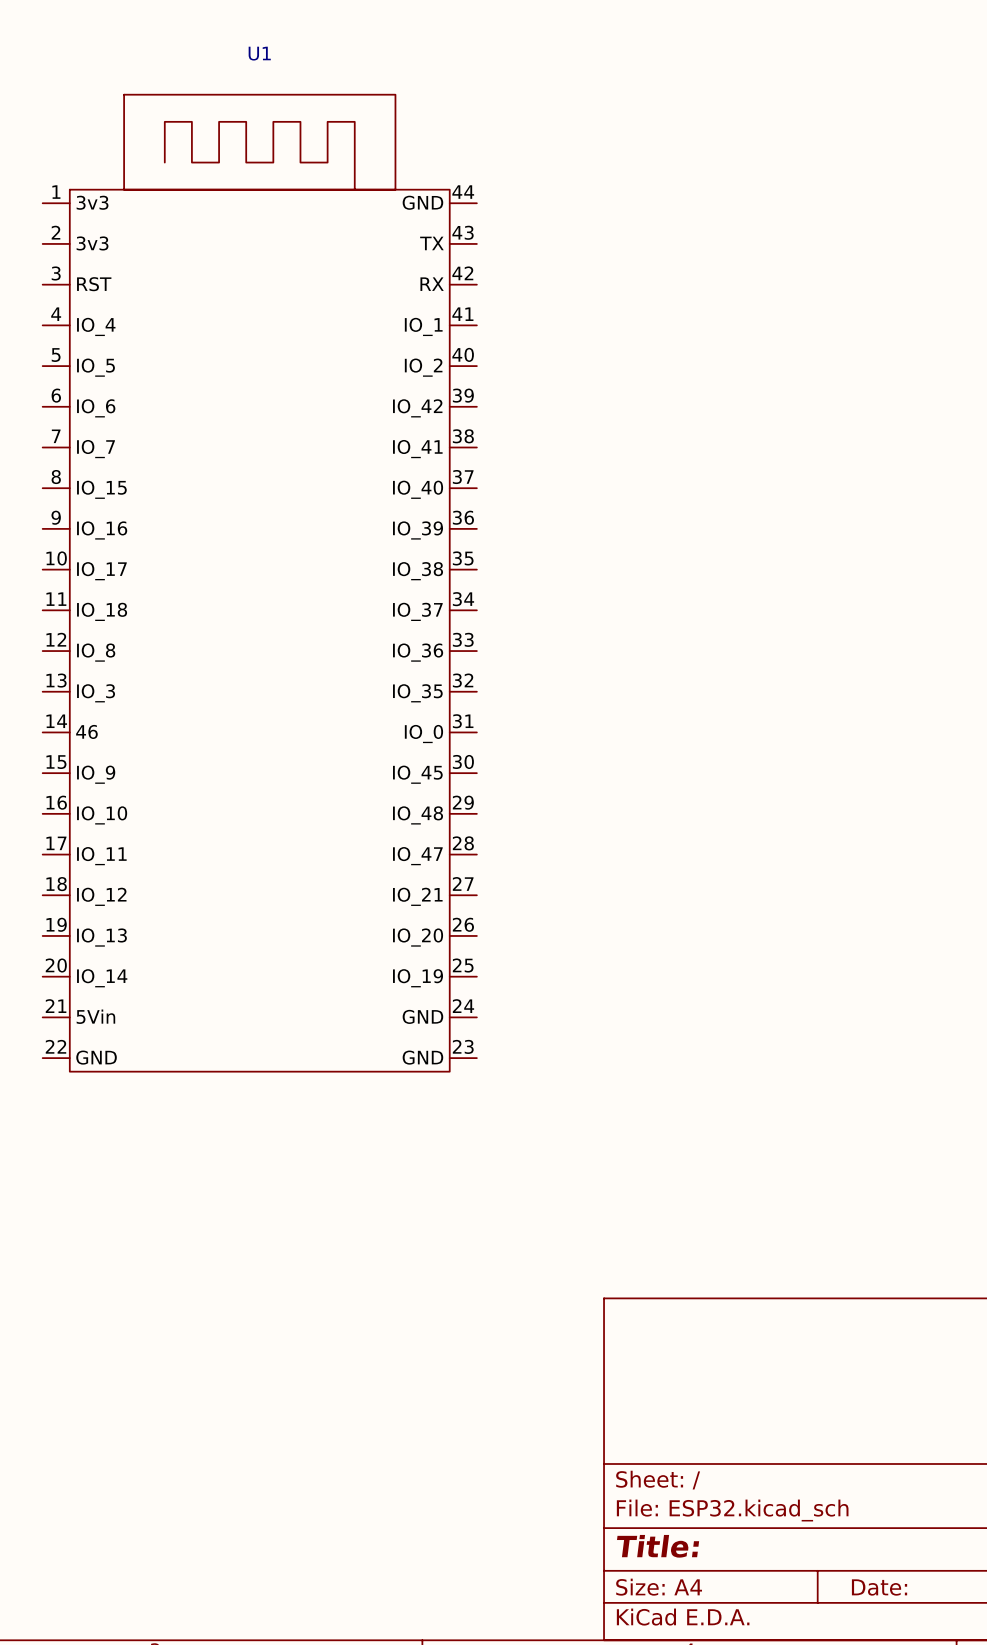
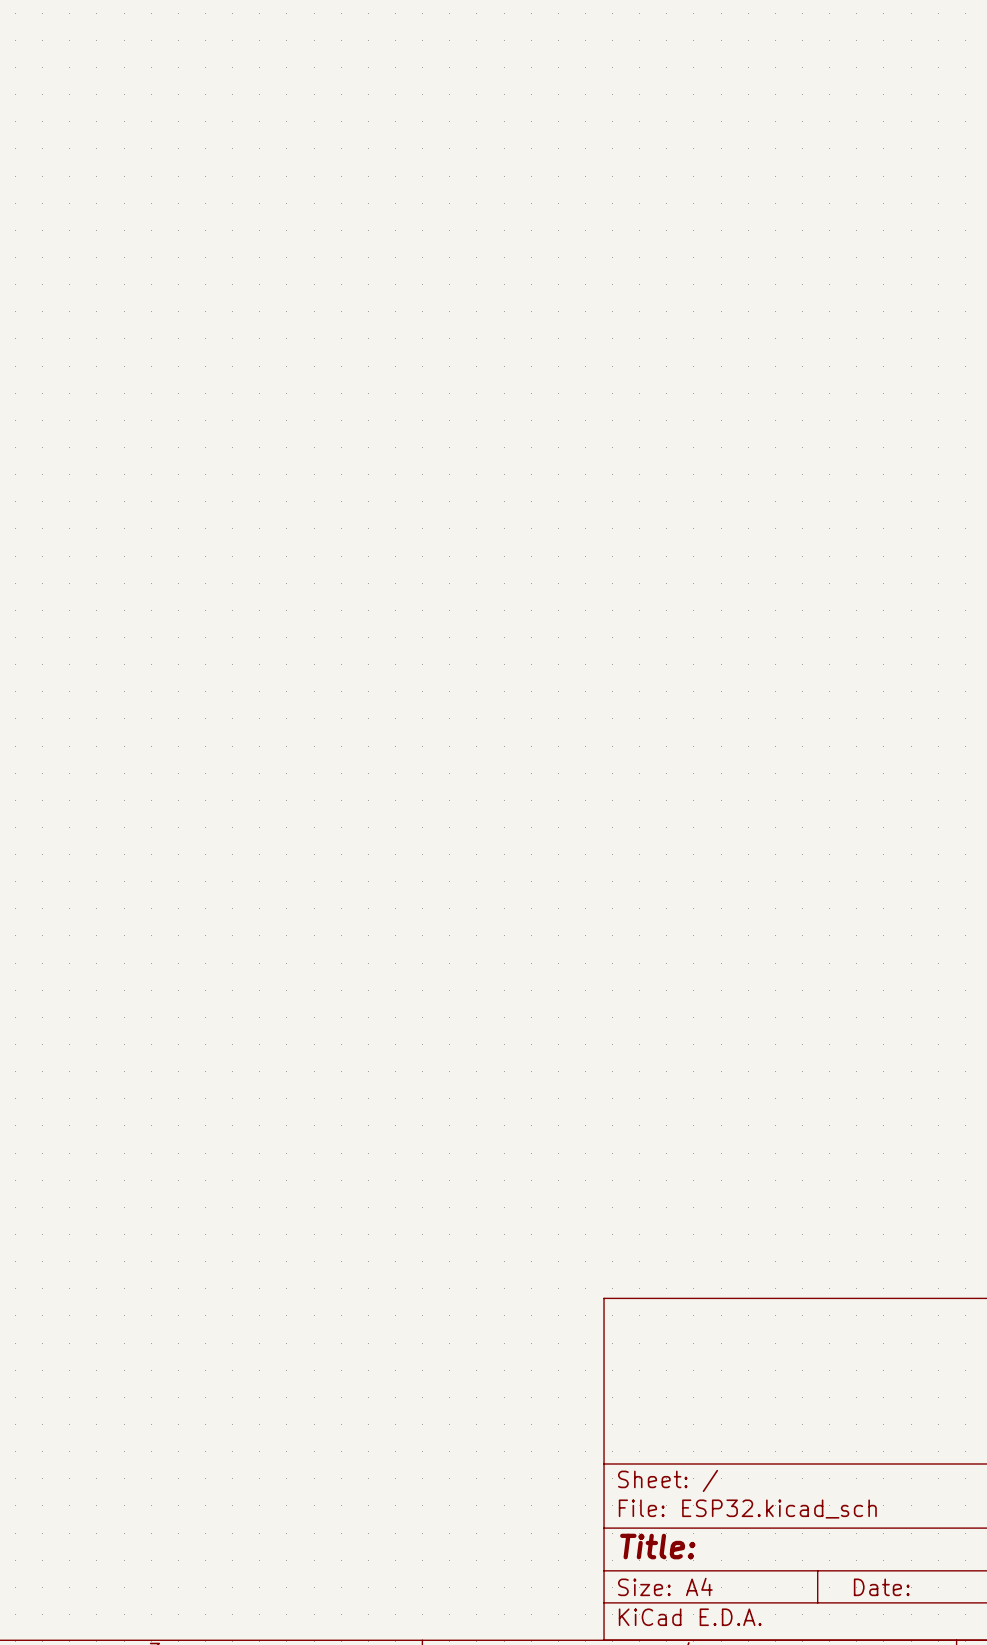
U1: (259, 583) -> none

